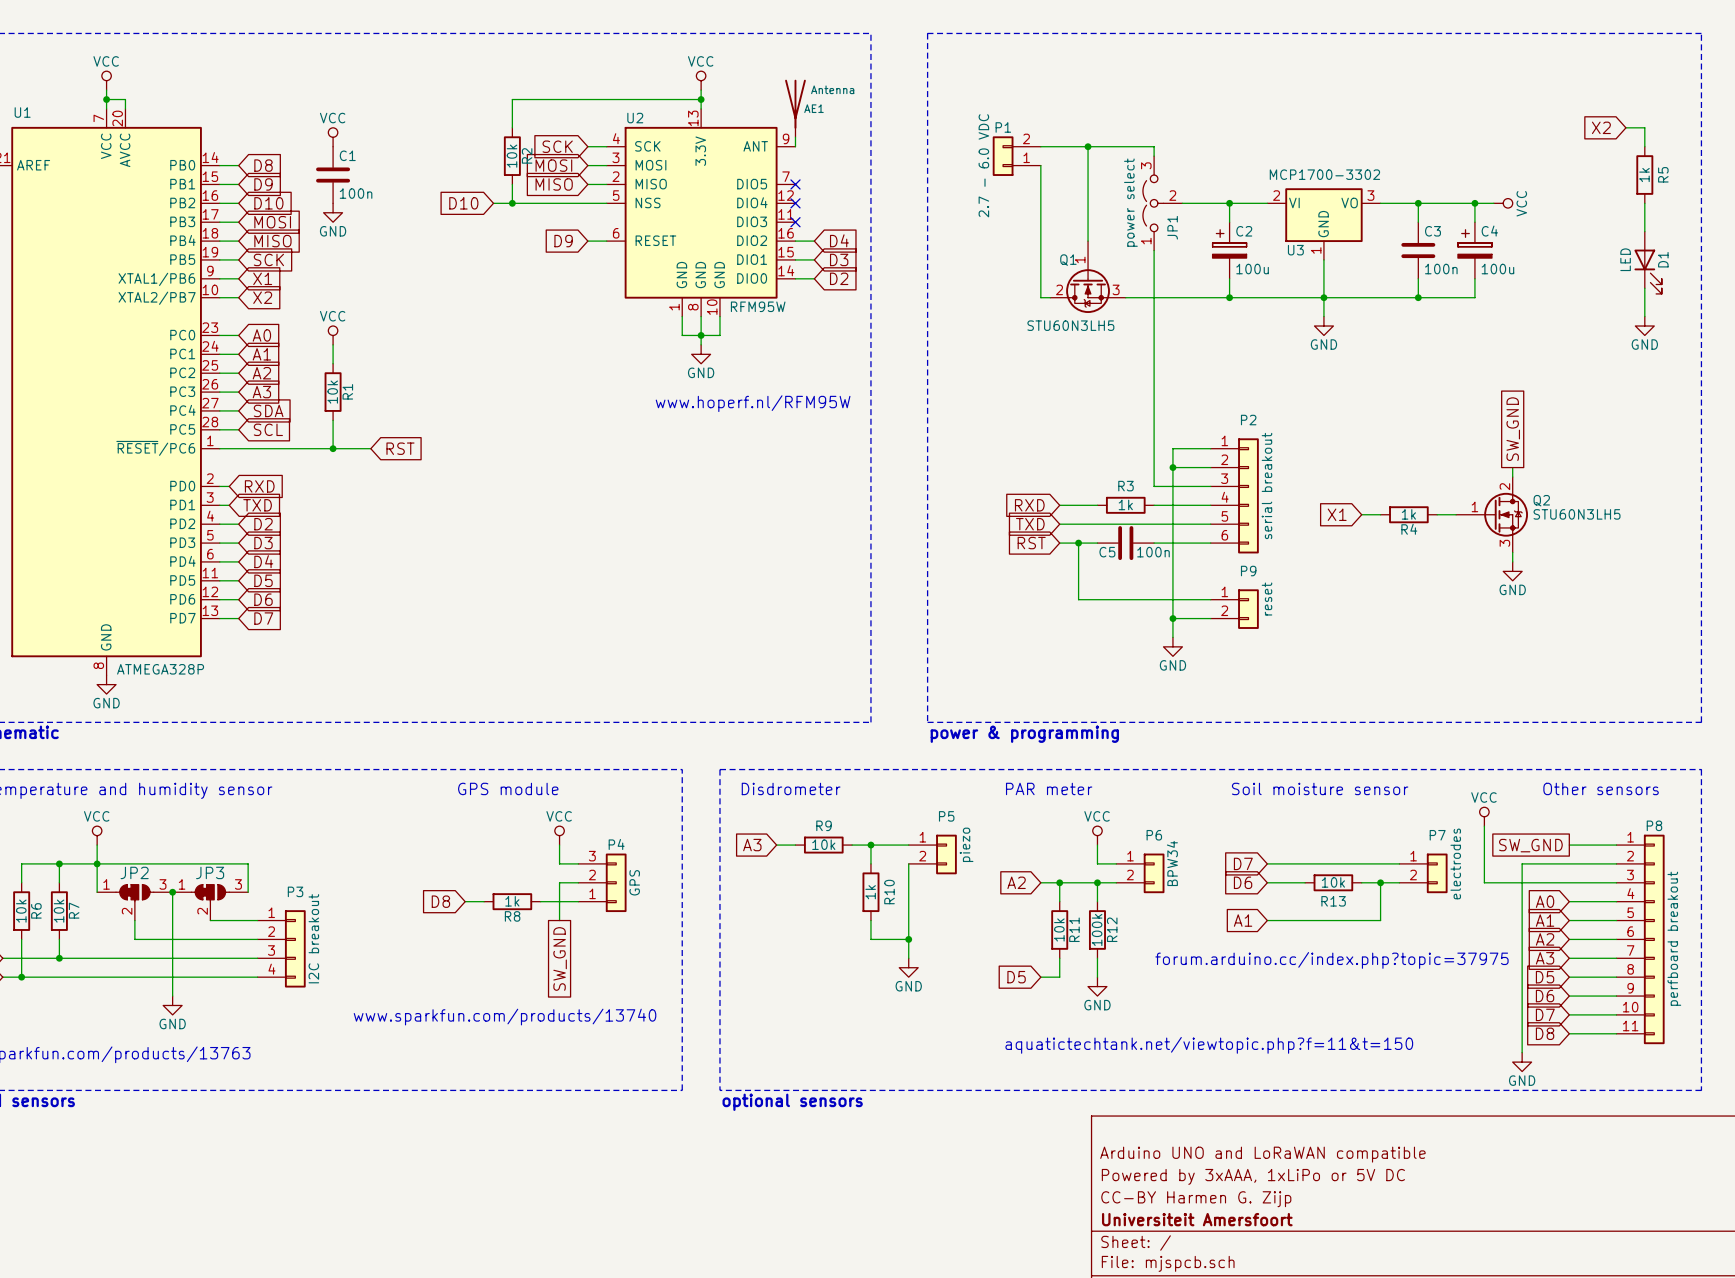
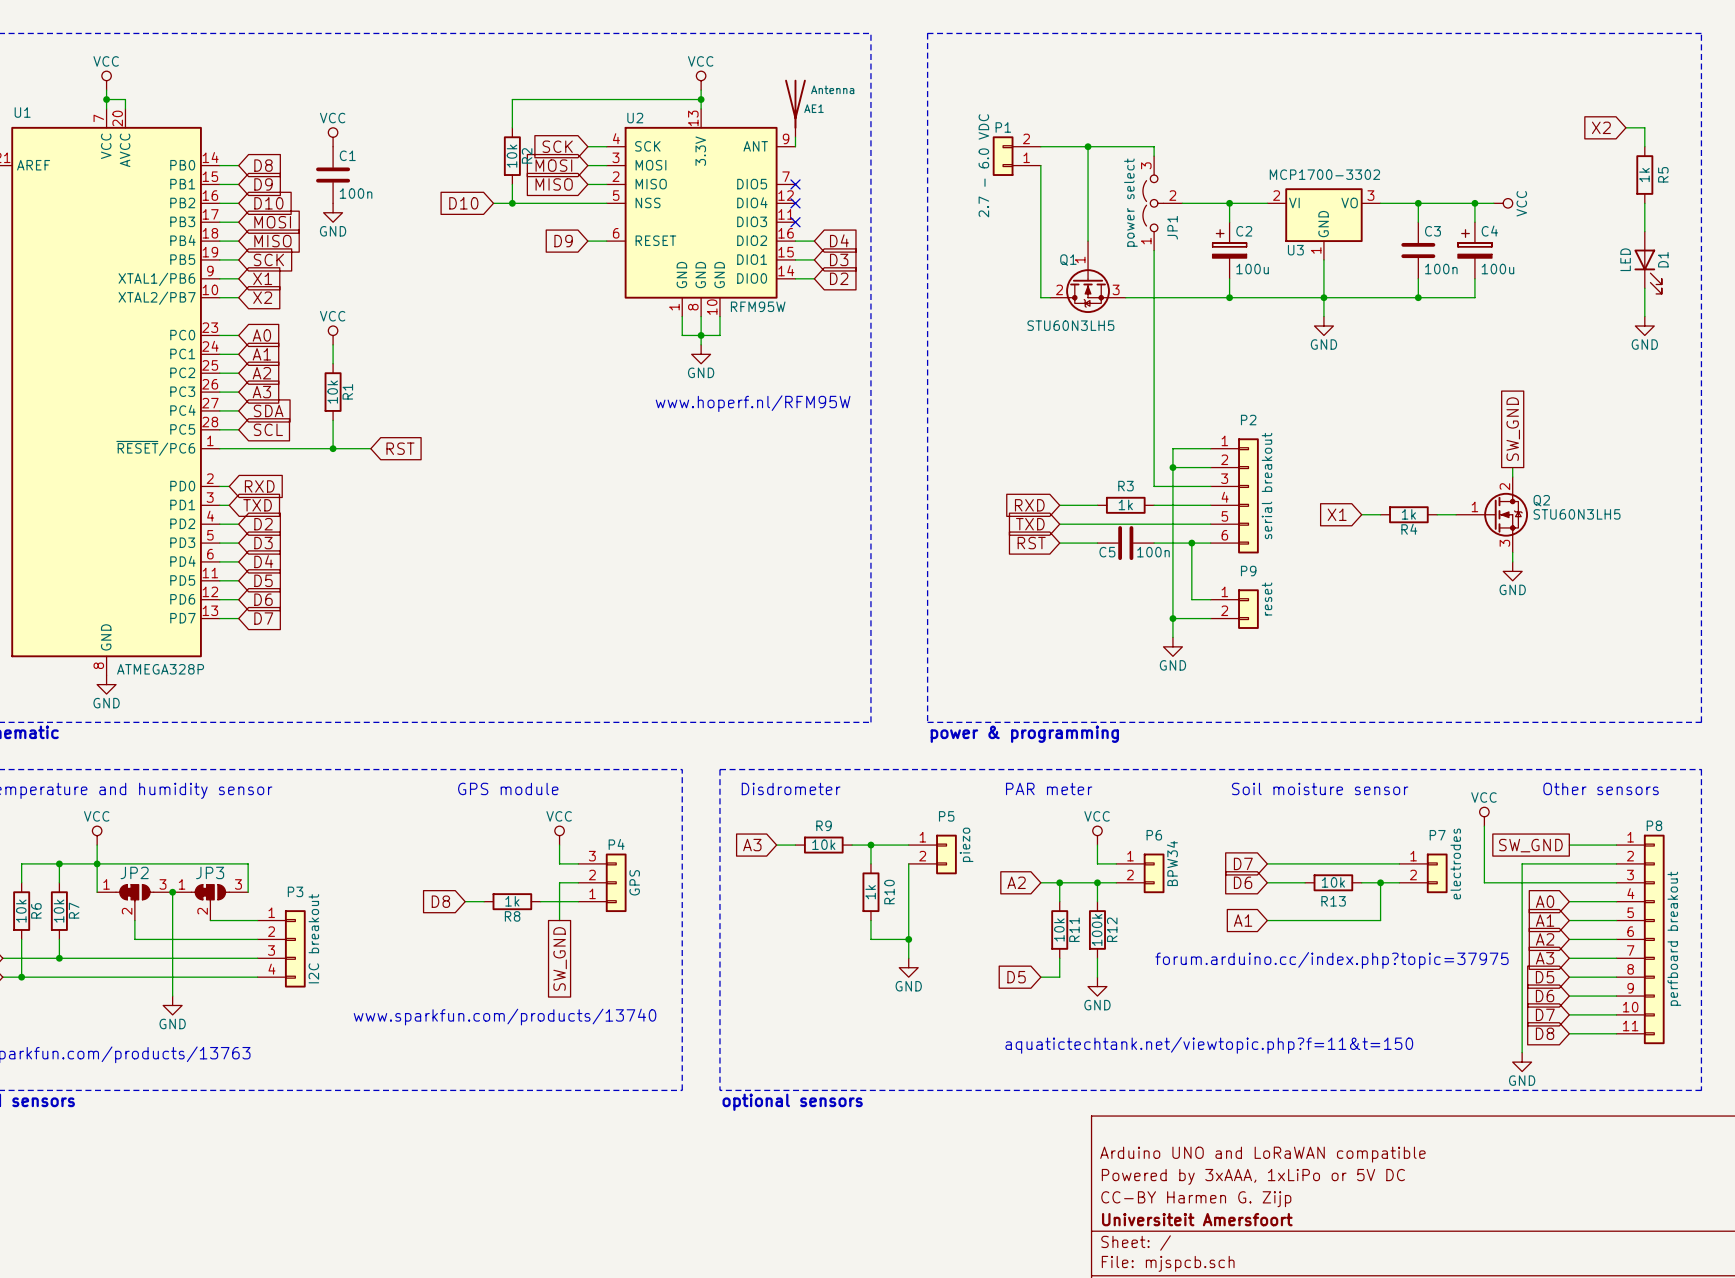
wire: (1078, 543) (1078, 599) (1191, 599) -> (1191, 543) (1191, 599)
junction: (1078, 543) -> none
junction: none -> (1191, 543)

